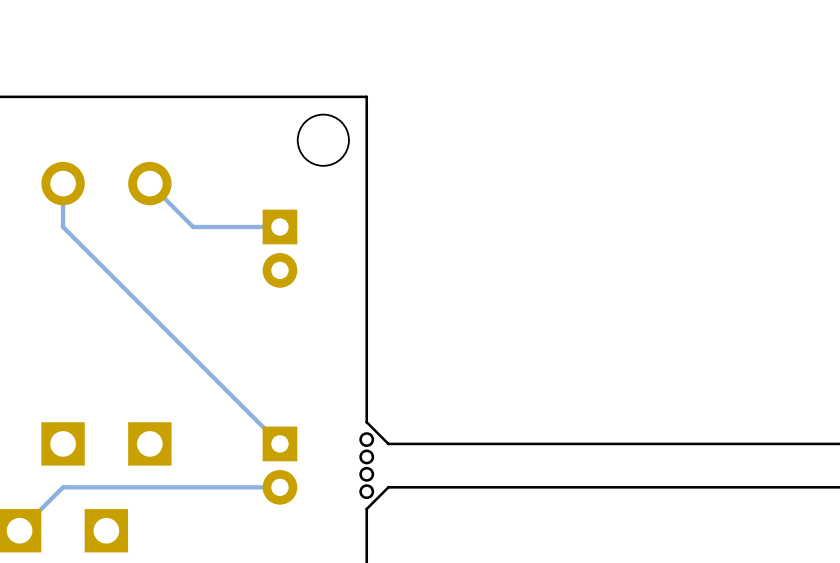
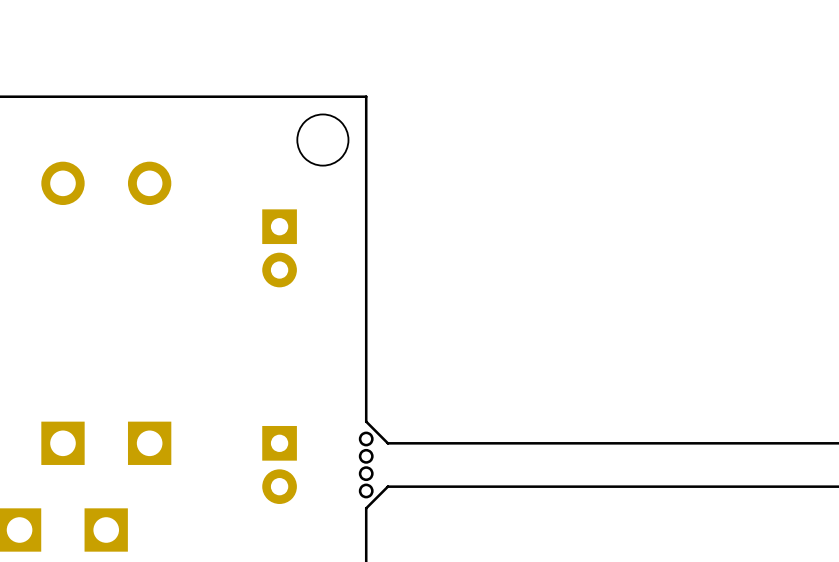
track: (63, 183) (63, 227) (279, 443) -> none
track: (149, 183) (193, 227) (279, 227) -> none
track: (279, 487) (63, 487) (19, 530) -> none

